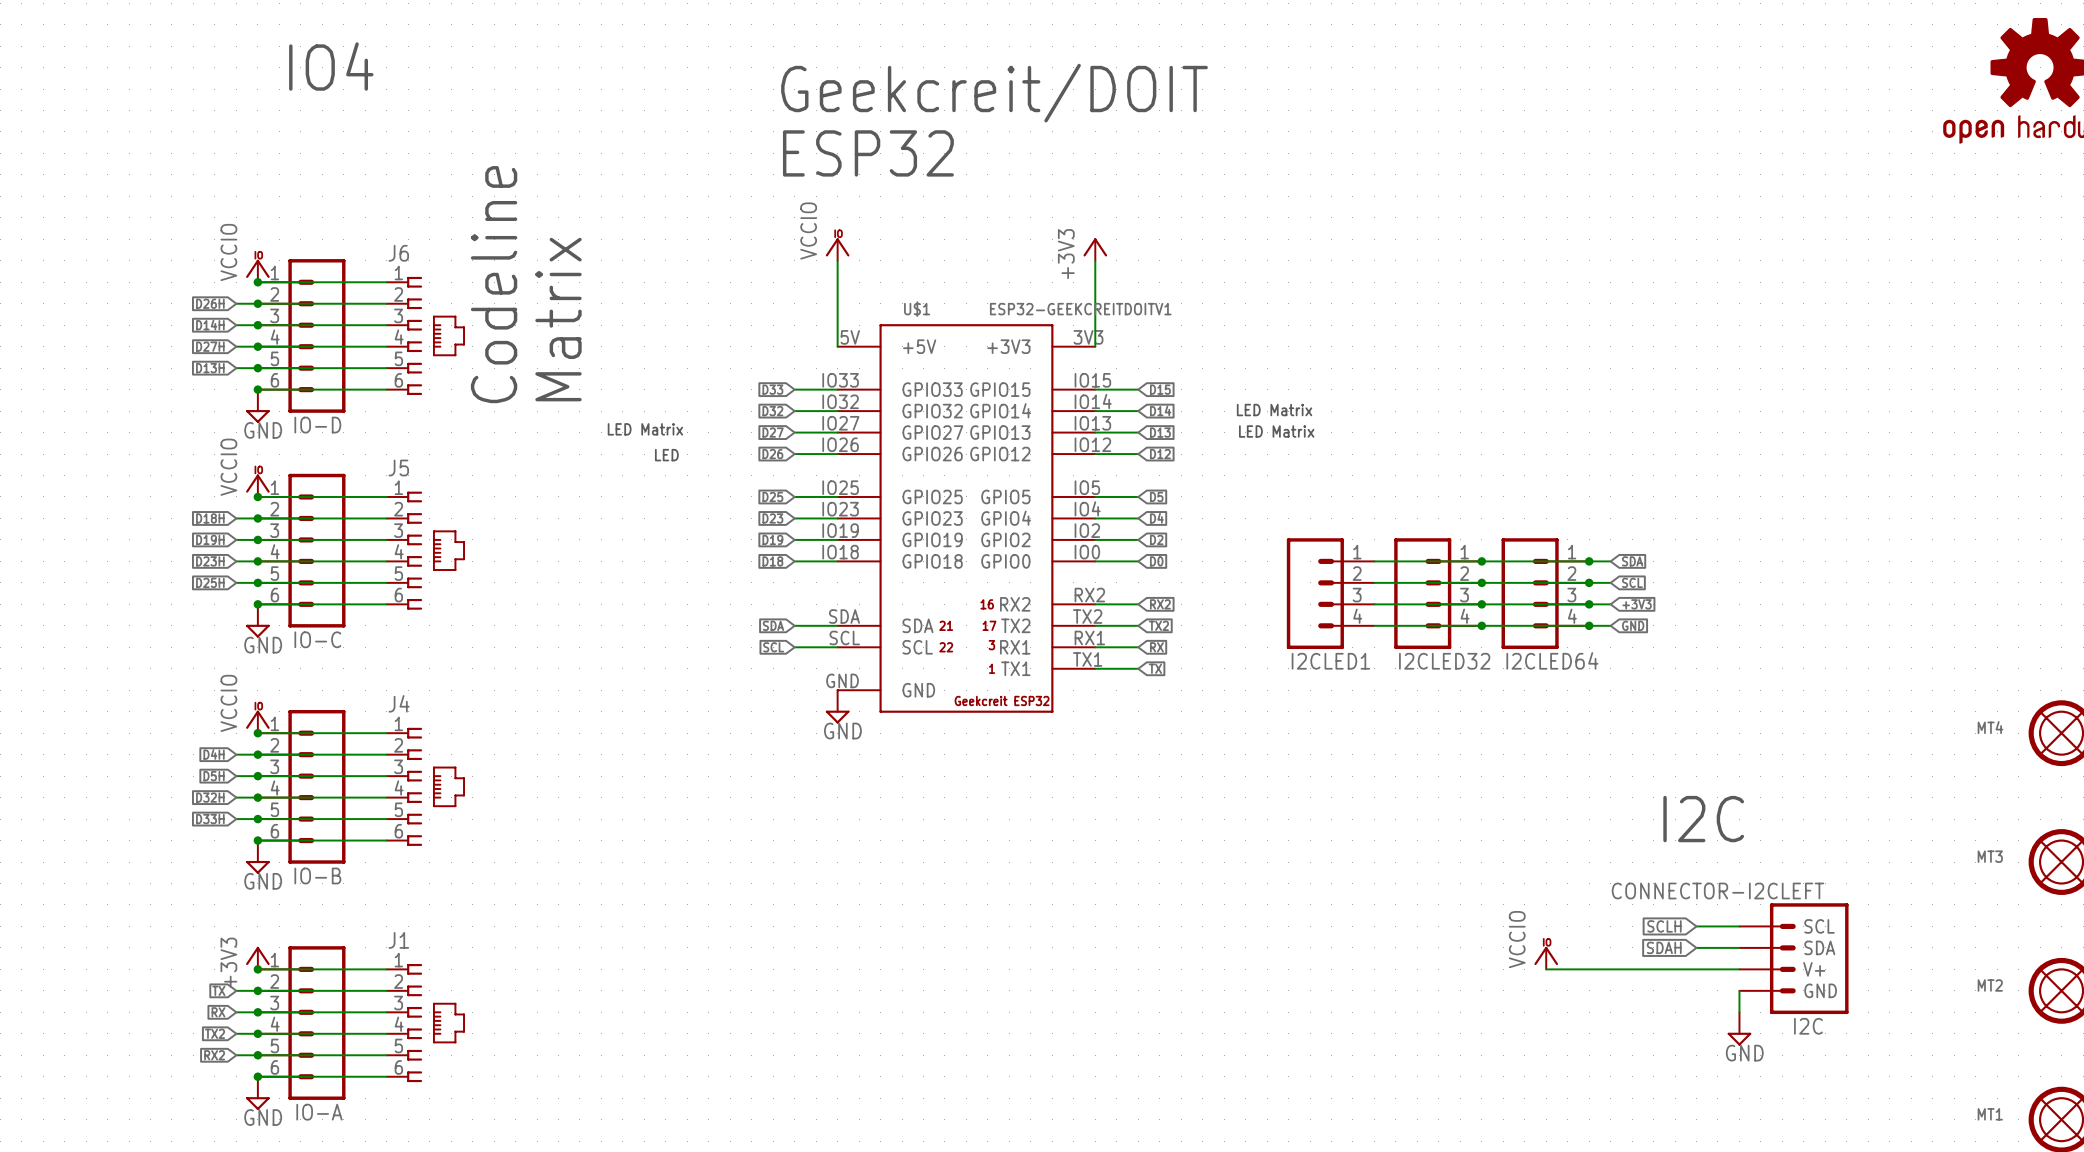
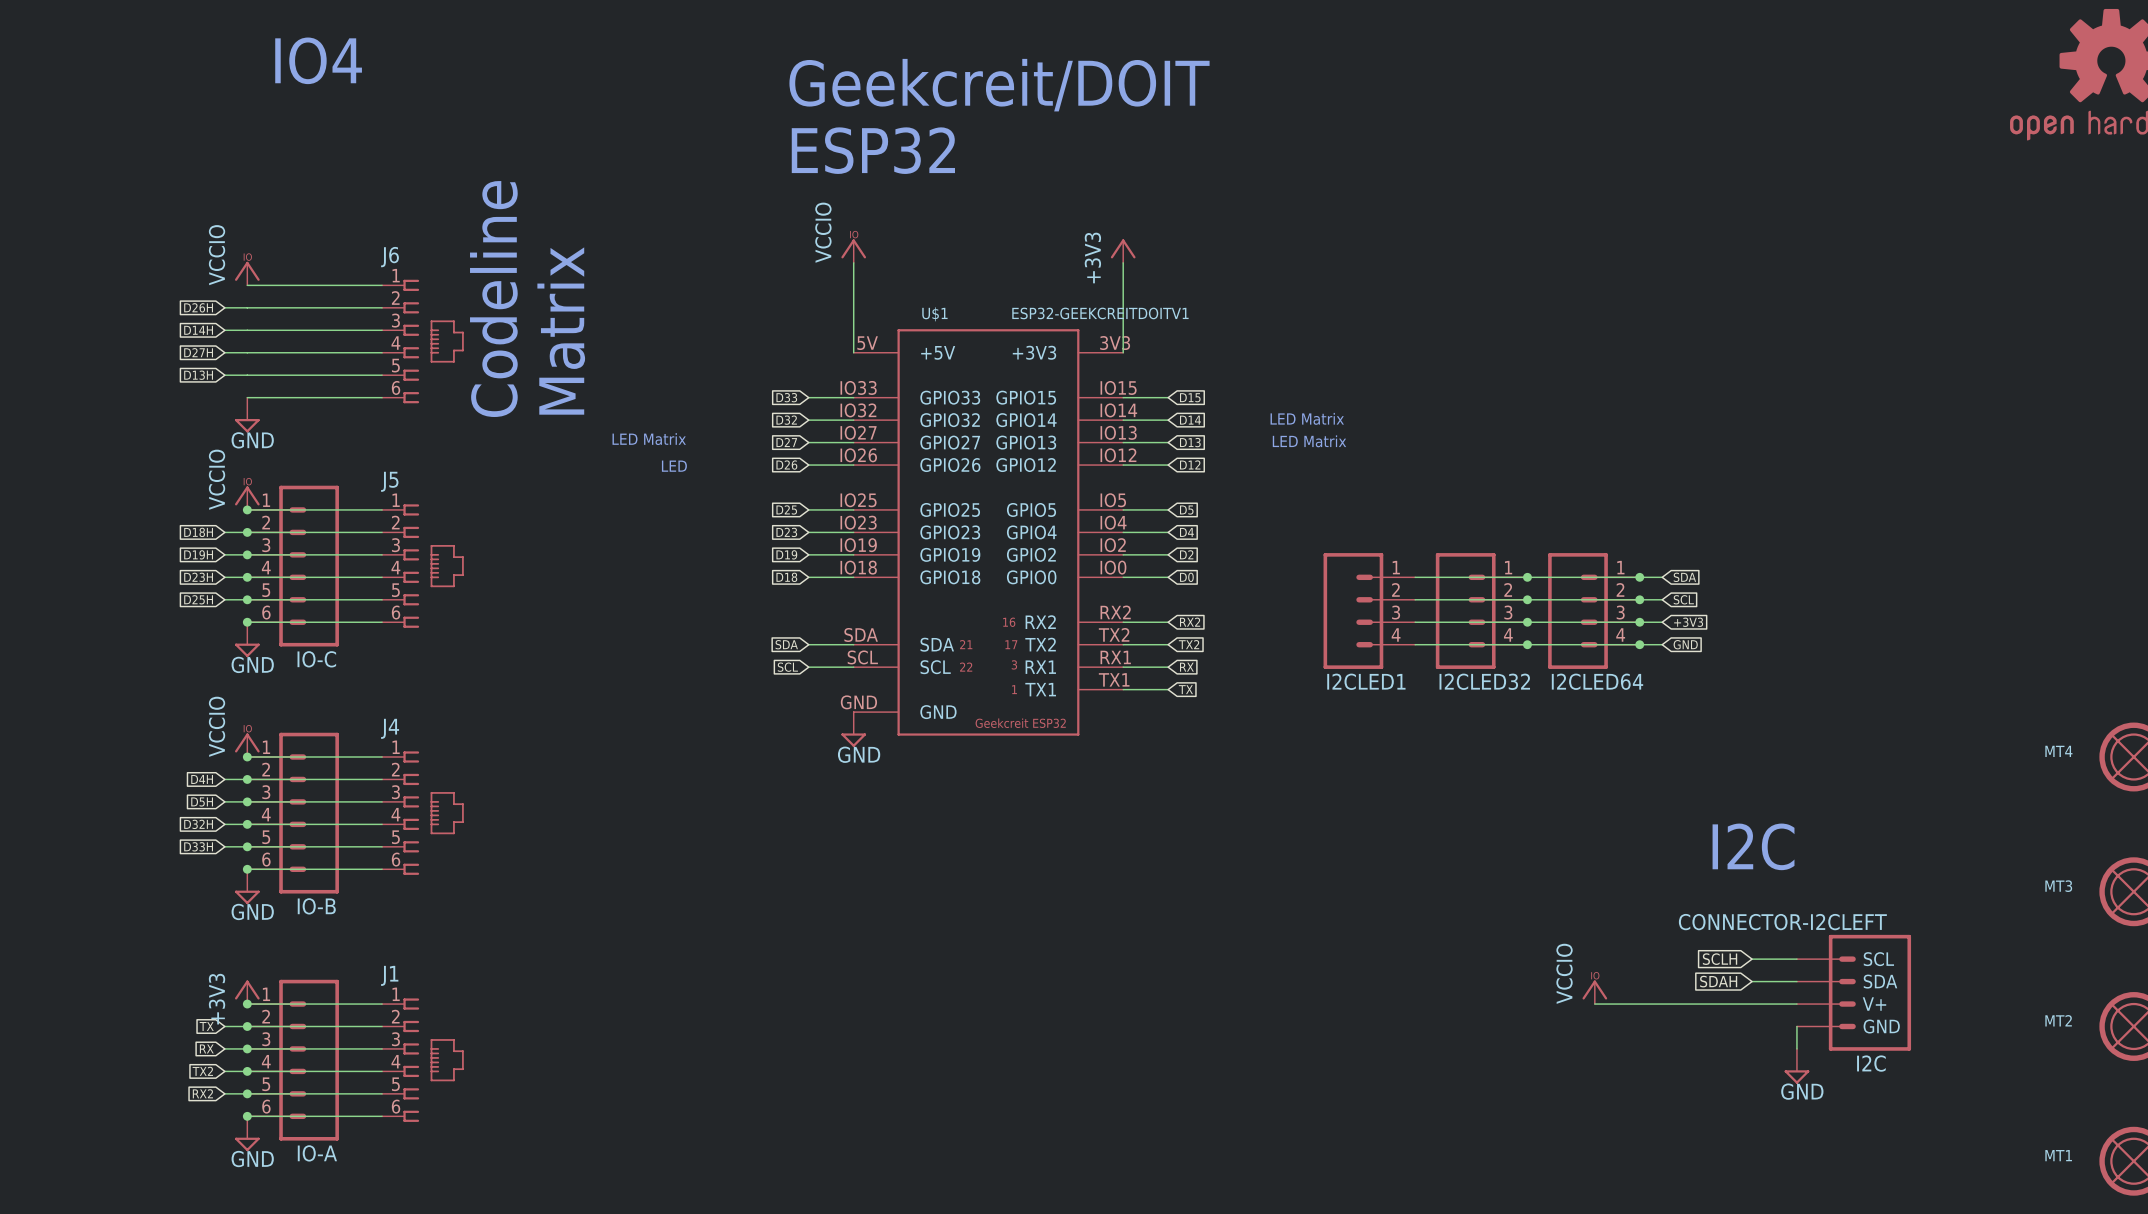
junction: (257, 282) -> none
junction: (257, 303) -> none
junction: (257, 325) -> none
IO-D: (301, 335) -> none
junction: (257, 346) -> none
junction: (257, 368) -> none
junction: (257, 389) -> none

